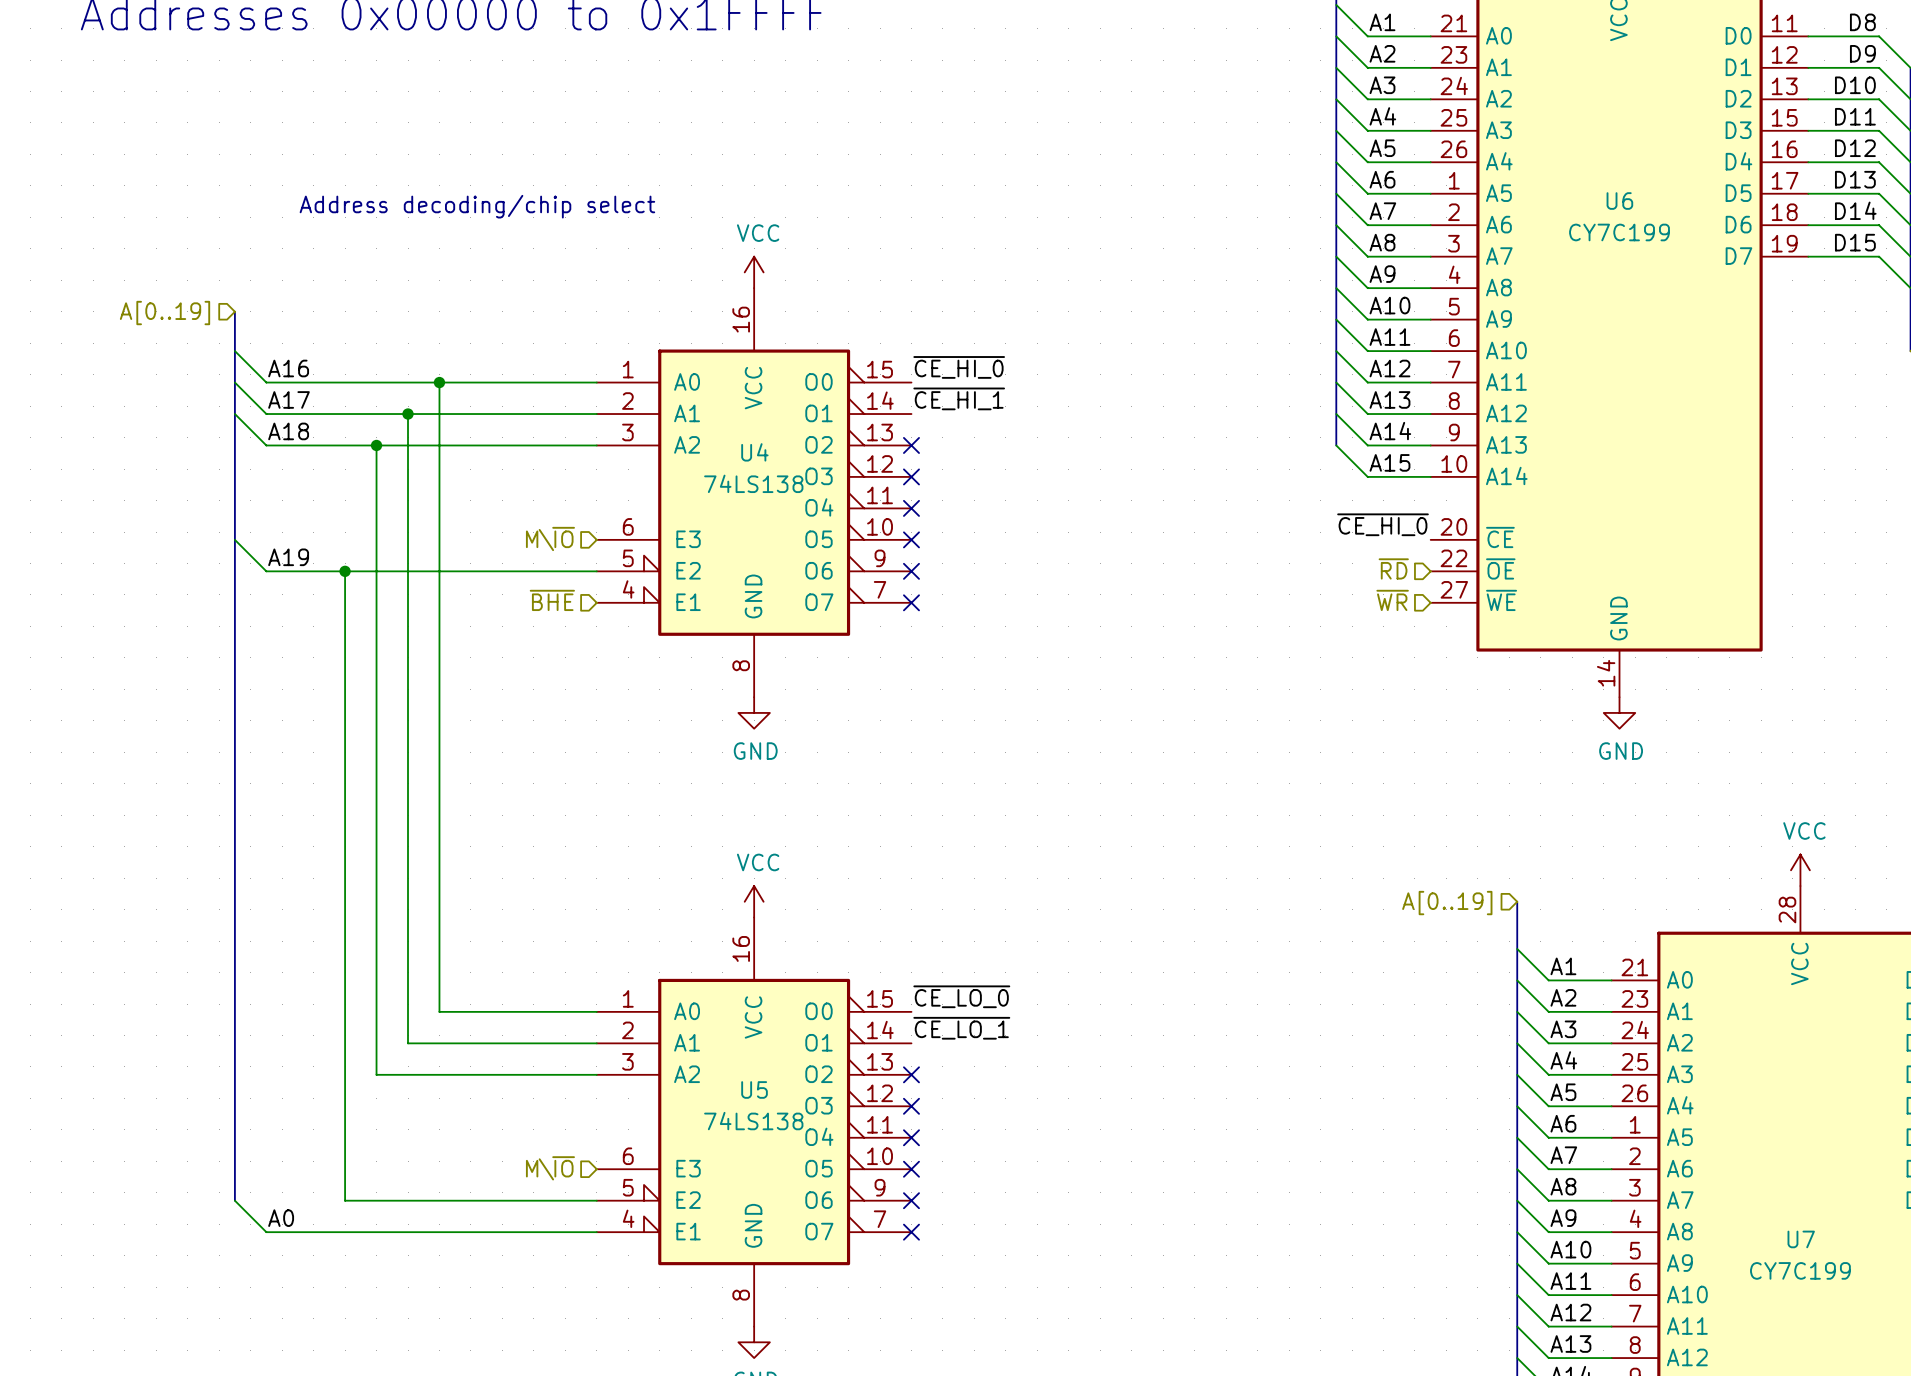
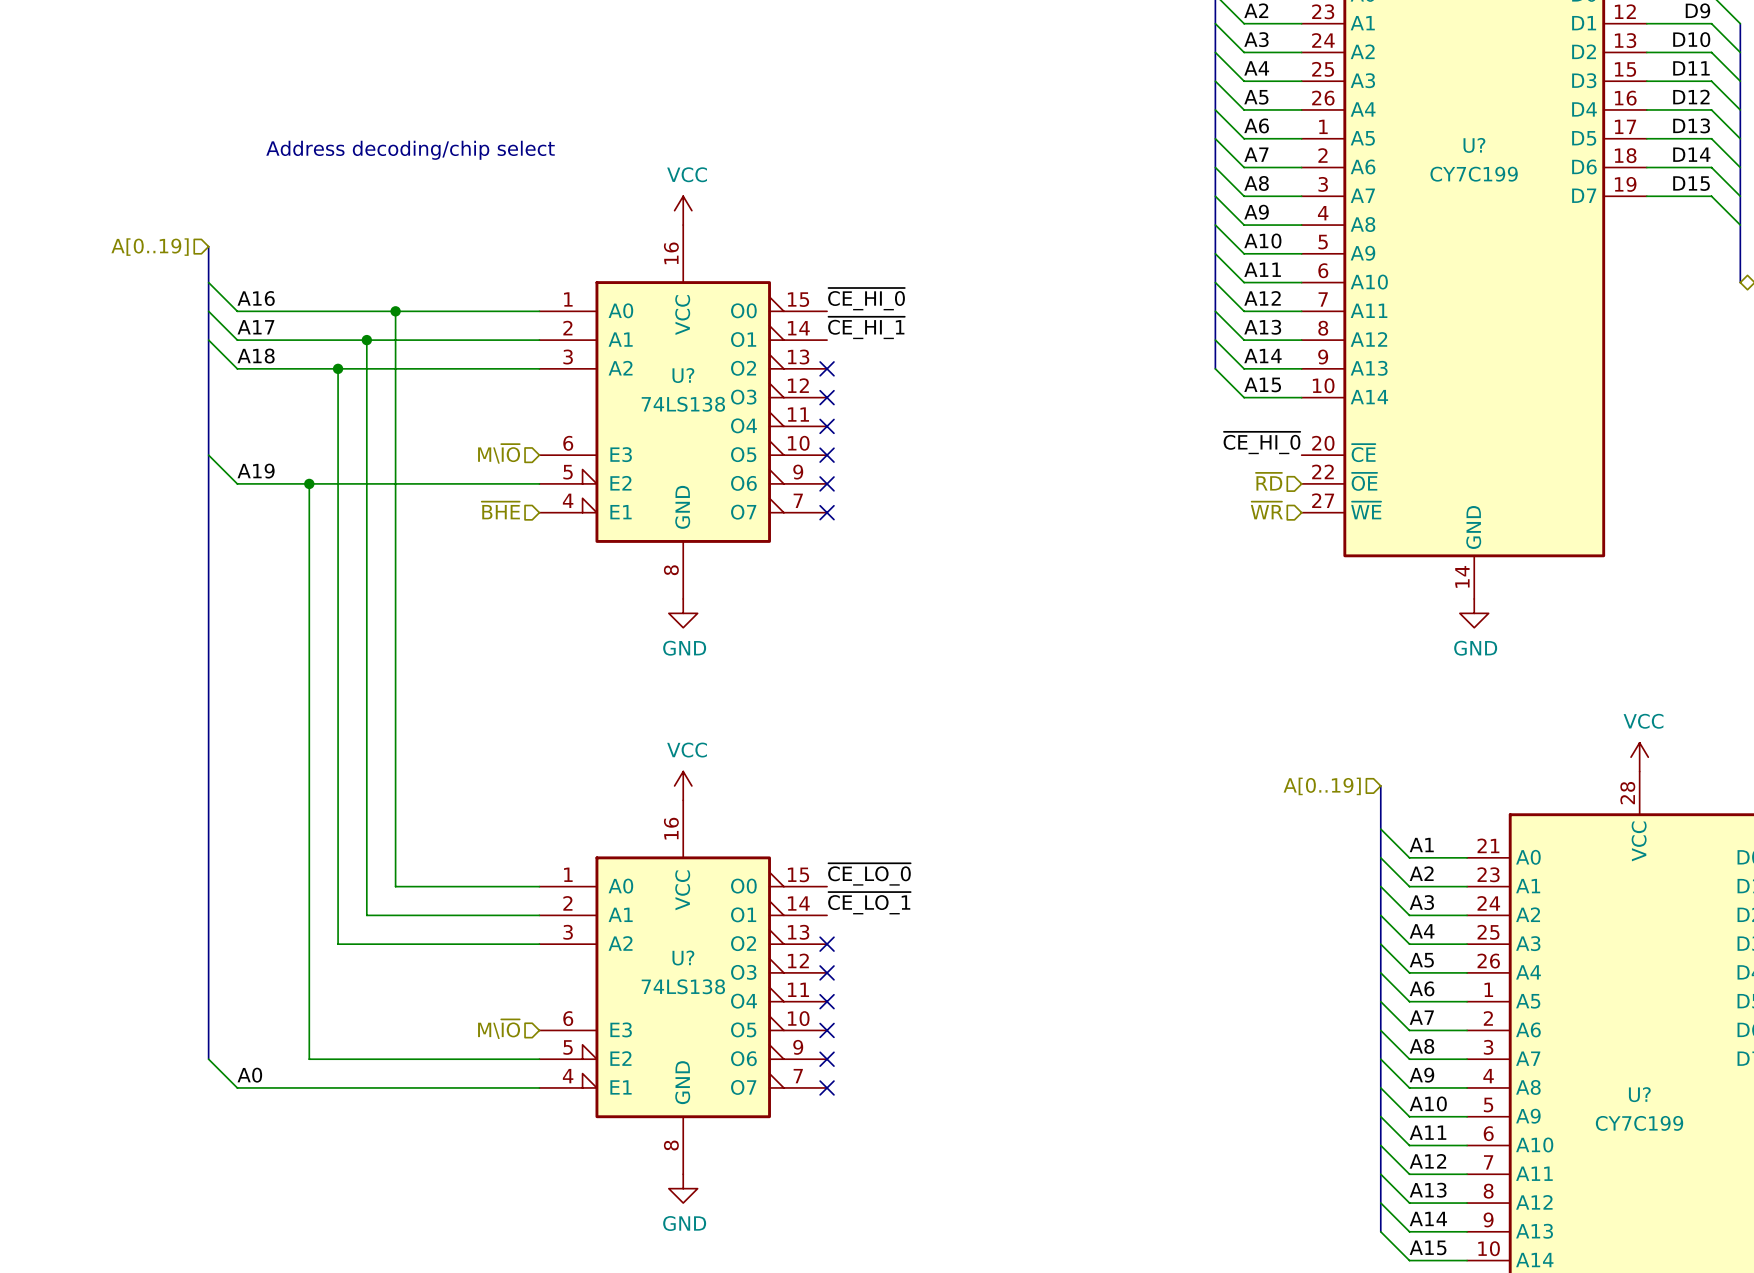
U6 name: U6 (1619, 201) -> U? (1474, 145)
U4 name: U4 (754, 452) -> U? (683, 375)
U5 name: U5 (754, 1089) -> U? (683, 958)
U7 name: U7 (1801, 1239) -> U? (1639, 1094)

